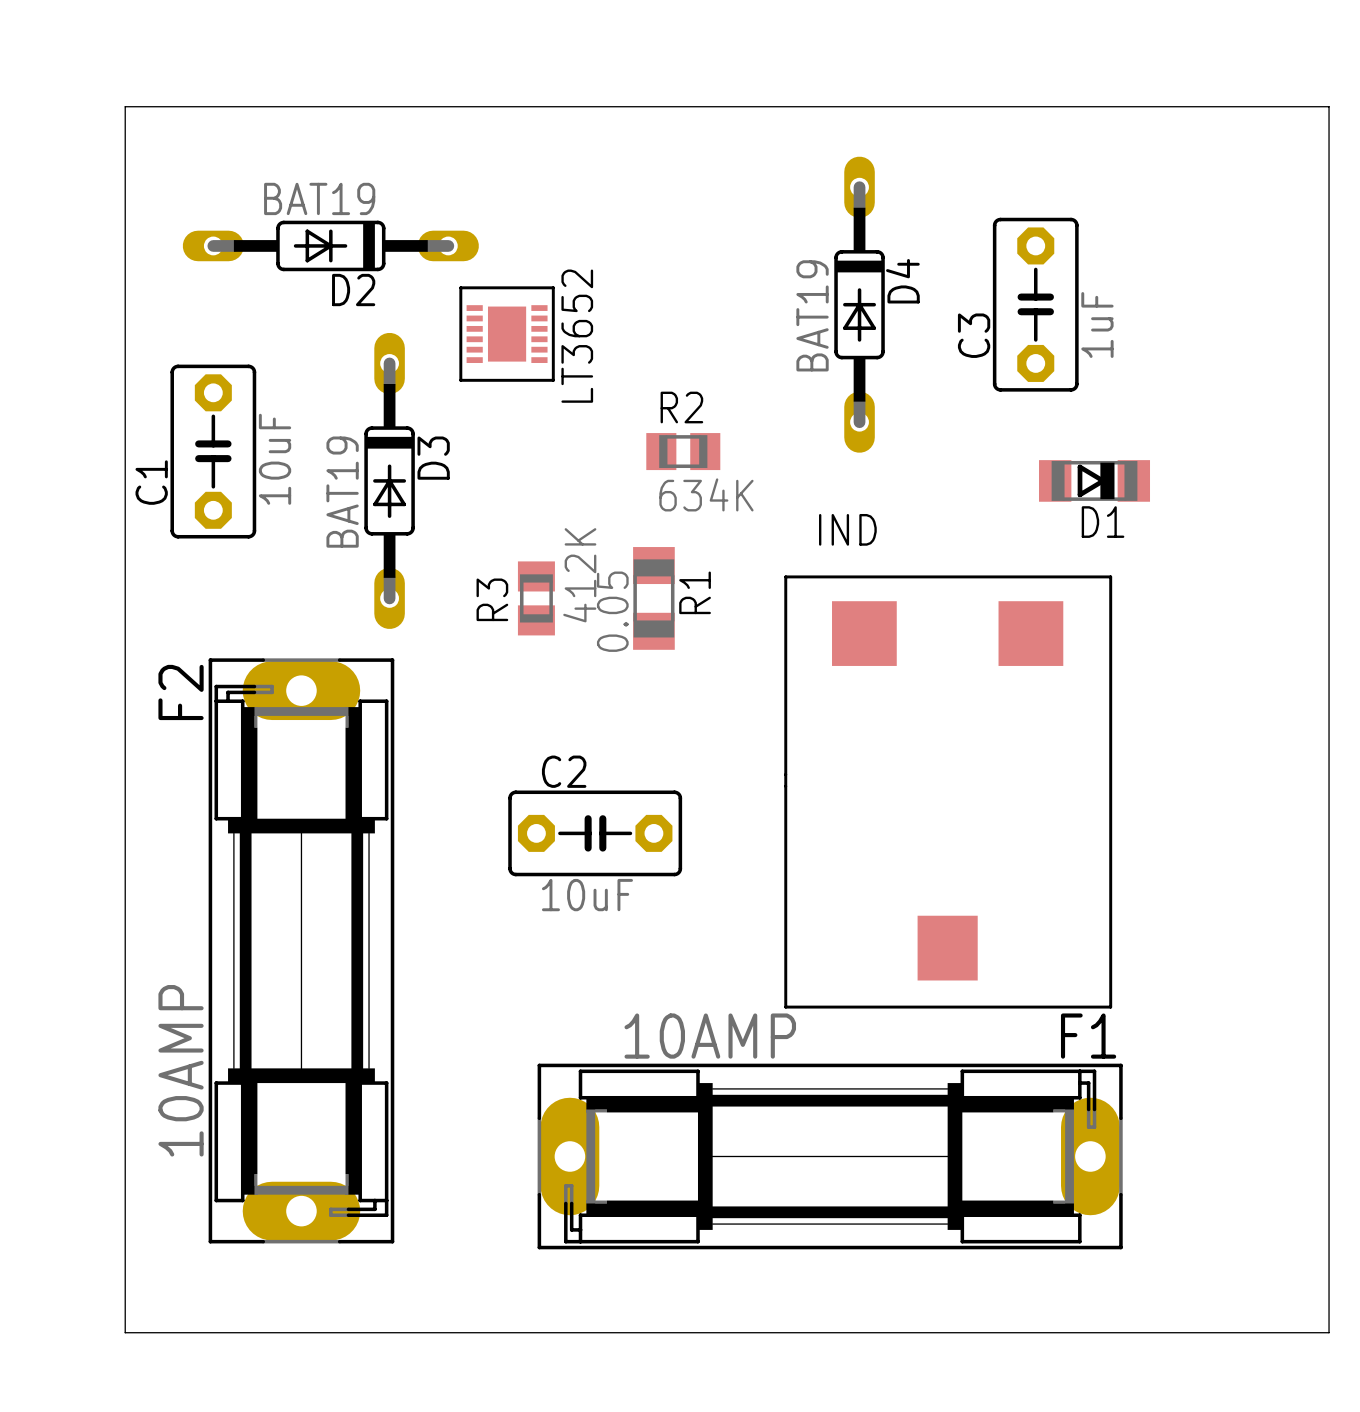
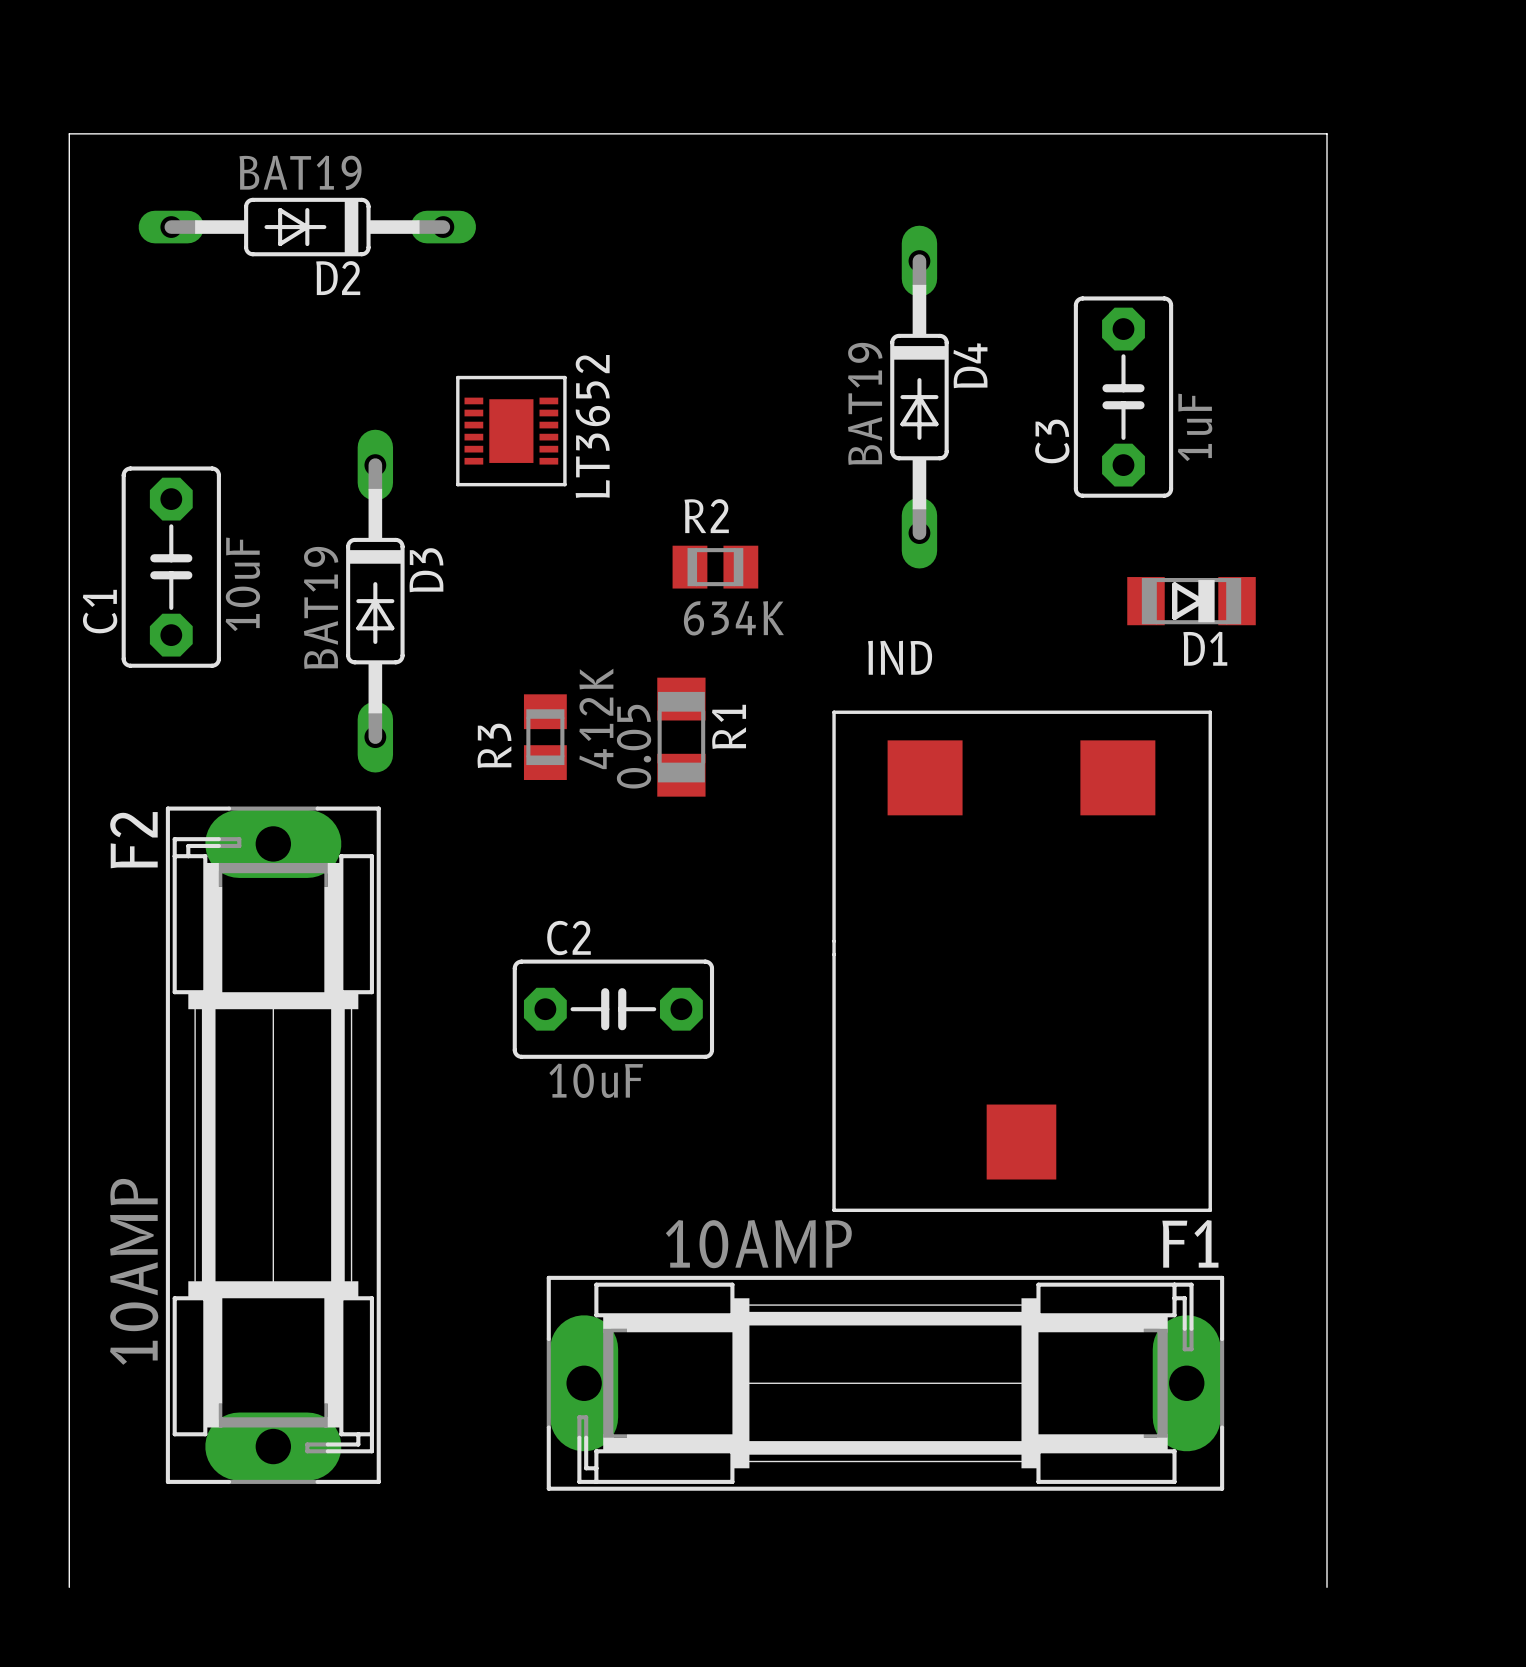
board edge: (125, 106) (1329, 106) (1329, 1332) (125, 1332) -> (69, 167) (69, 133) (1327, 133) (1327, 1587)
D2 footprint: [182, 220, 479, 272] -> [138, 197, 477, 257]

